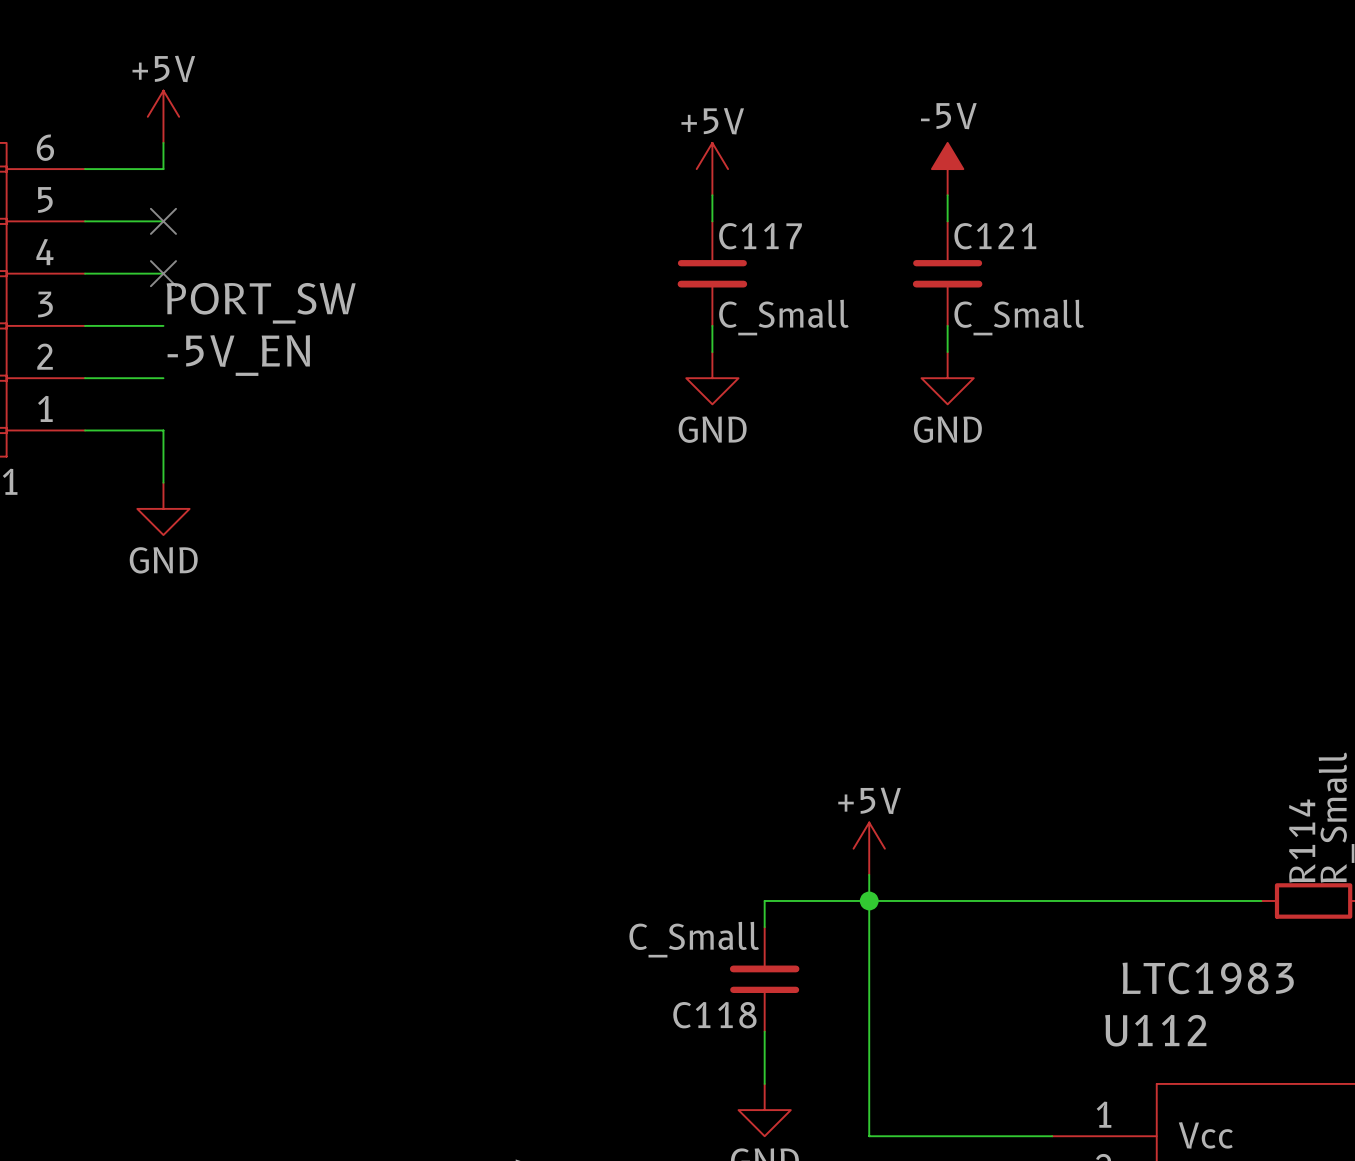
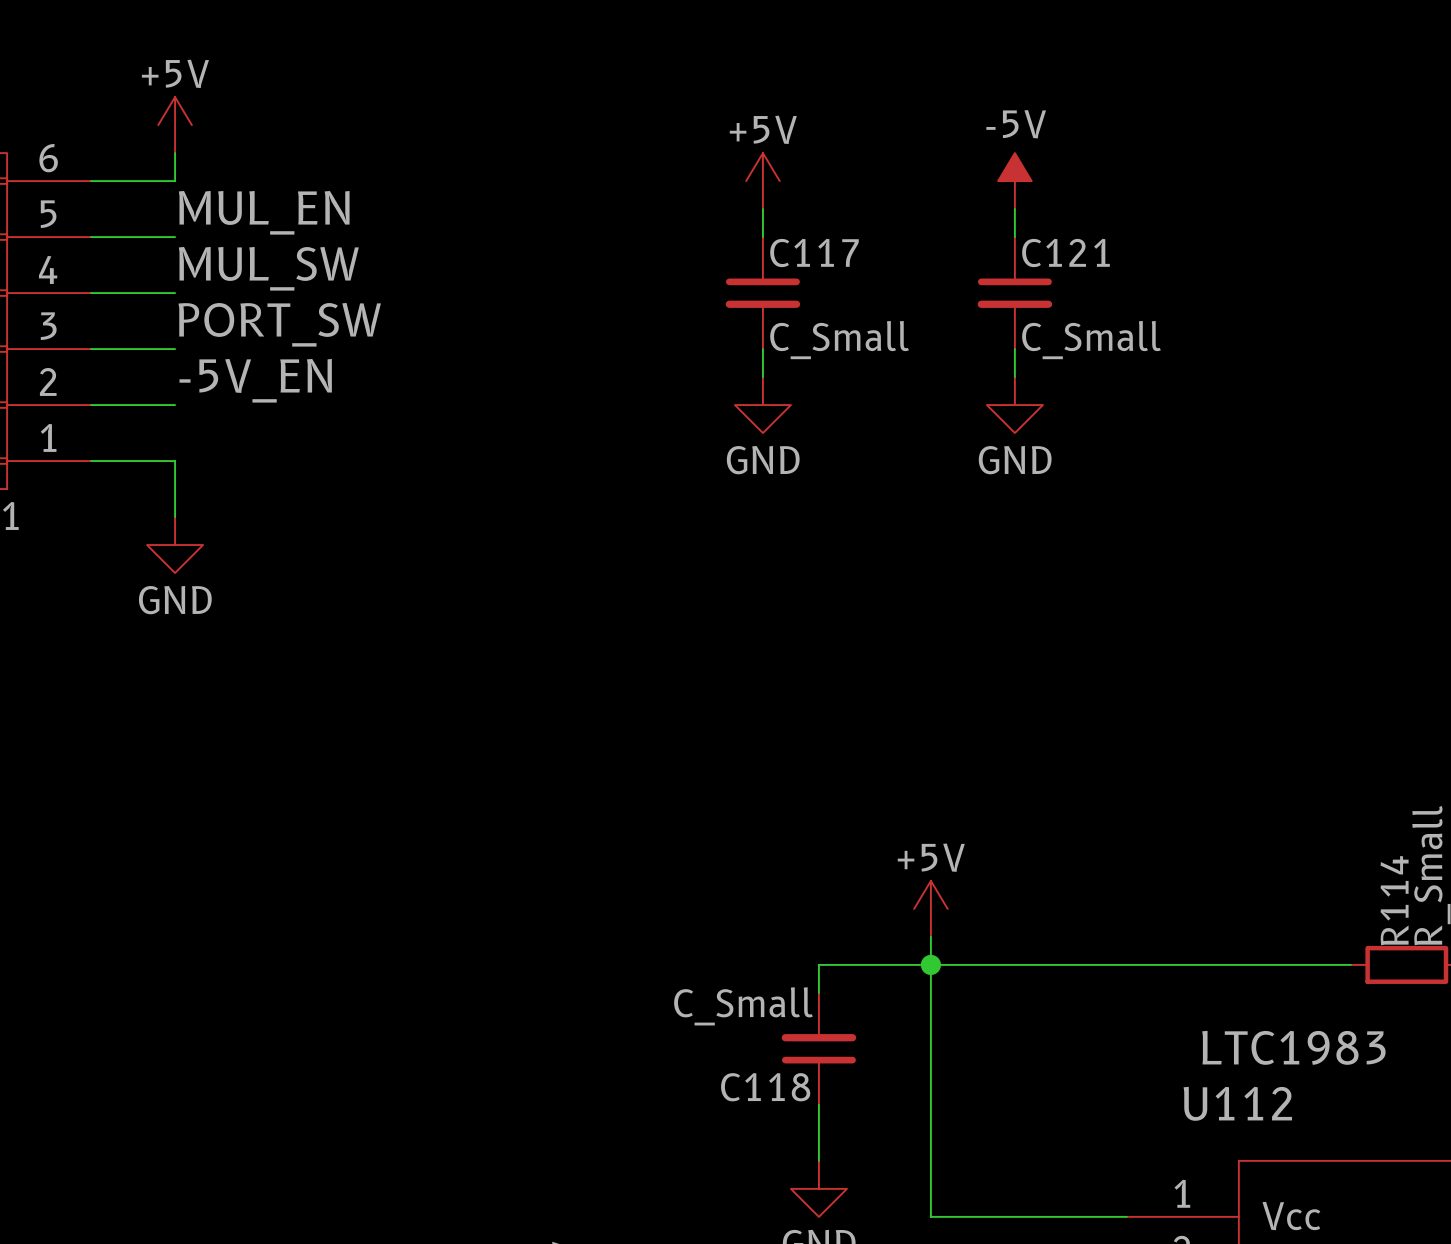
label: none -> MUL_EN (264, 212)
no-connect mark: (163, 221) -> none
label: none -> MUL_SW (268, 268)
no-connect mark: (163, 273) -> none

